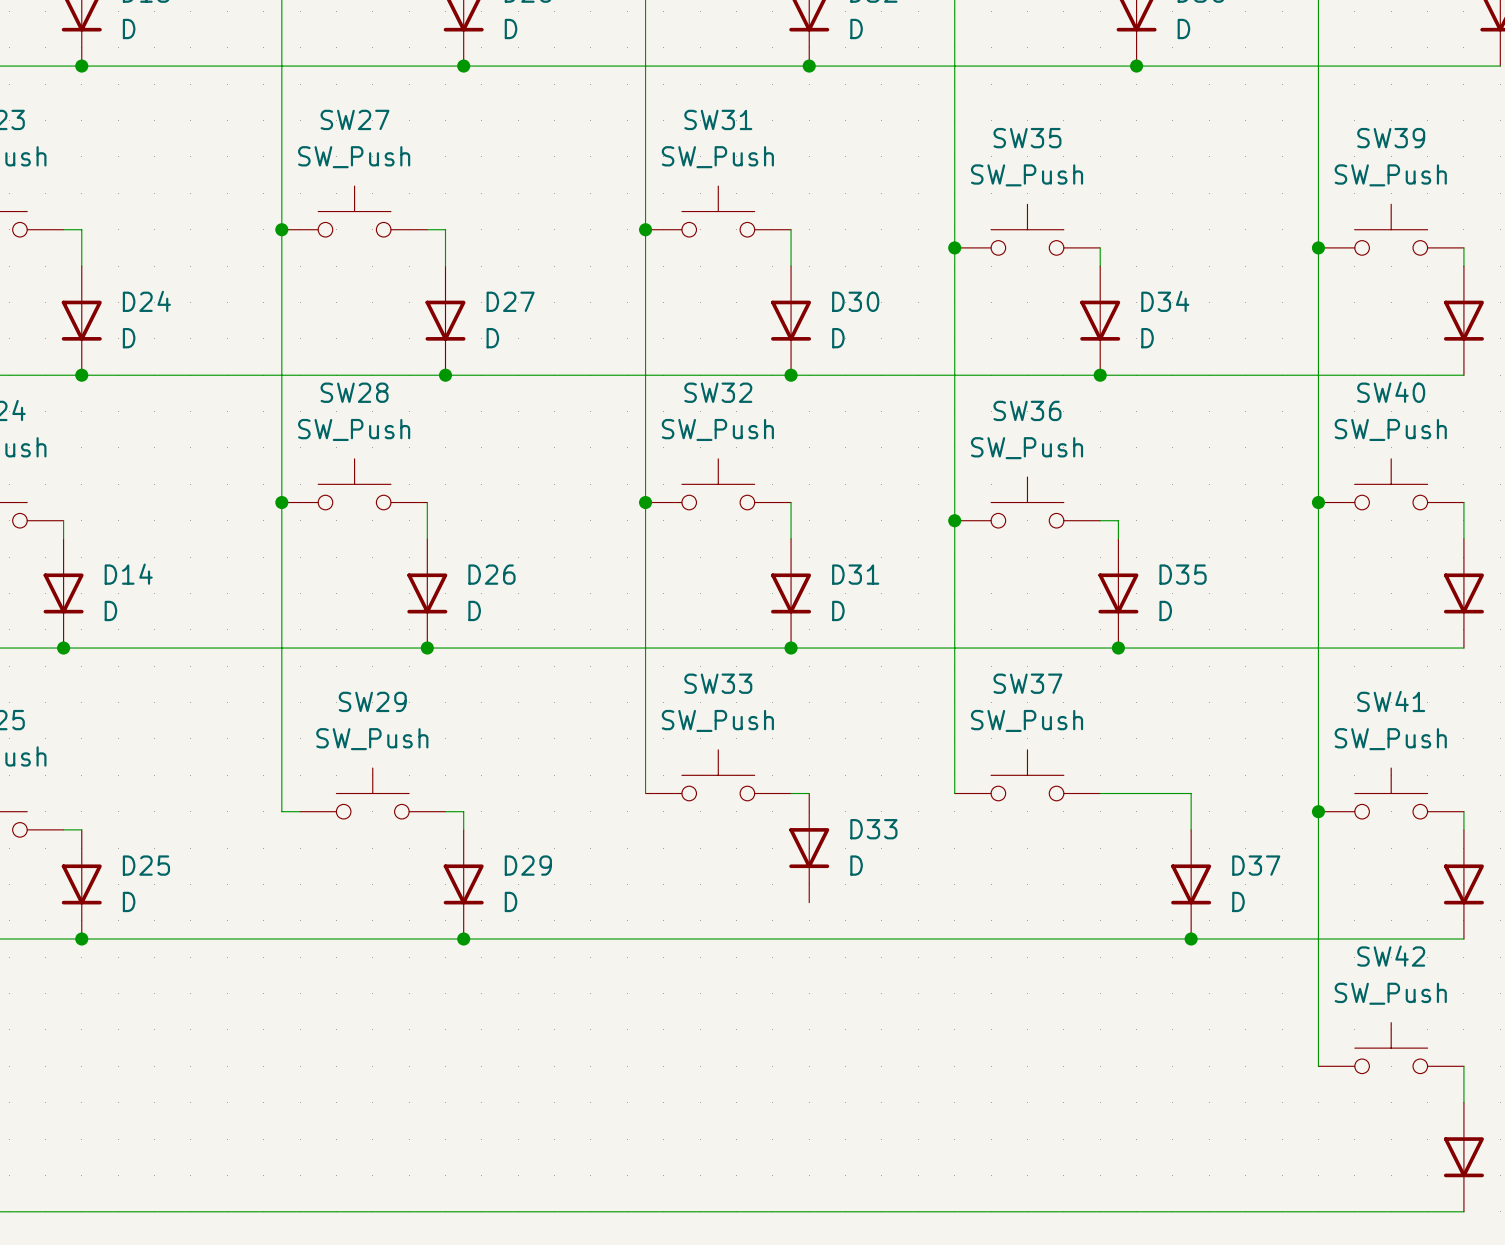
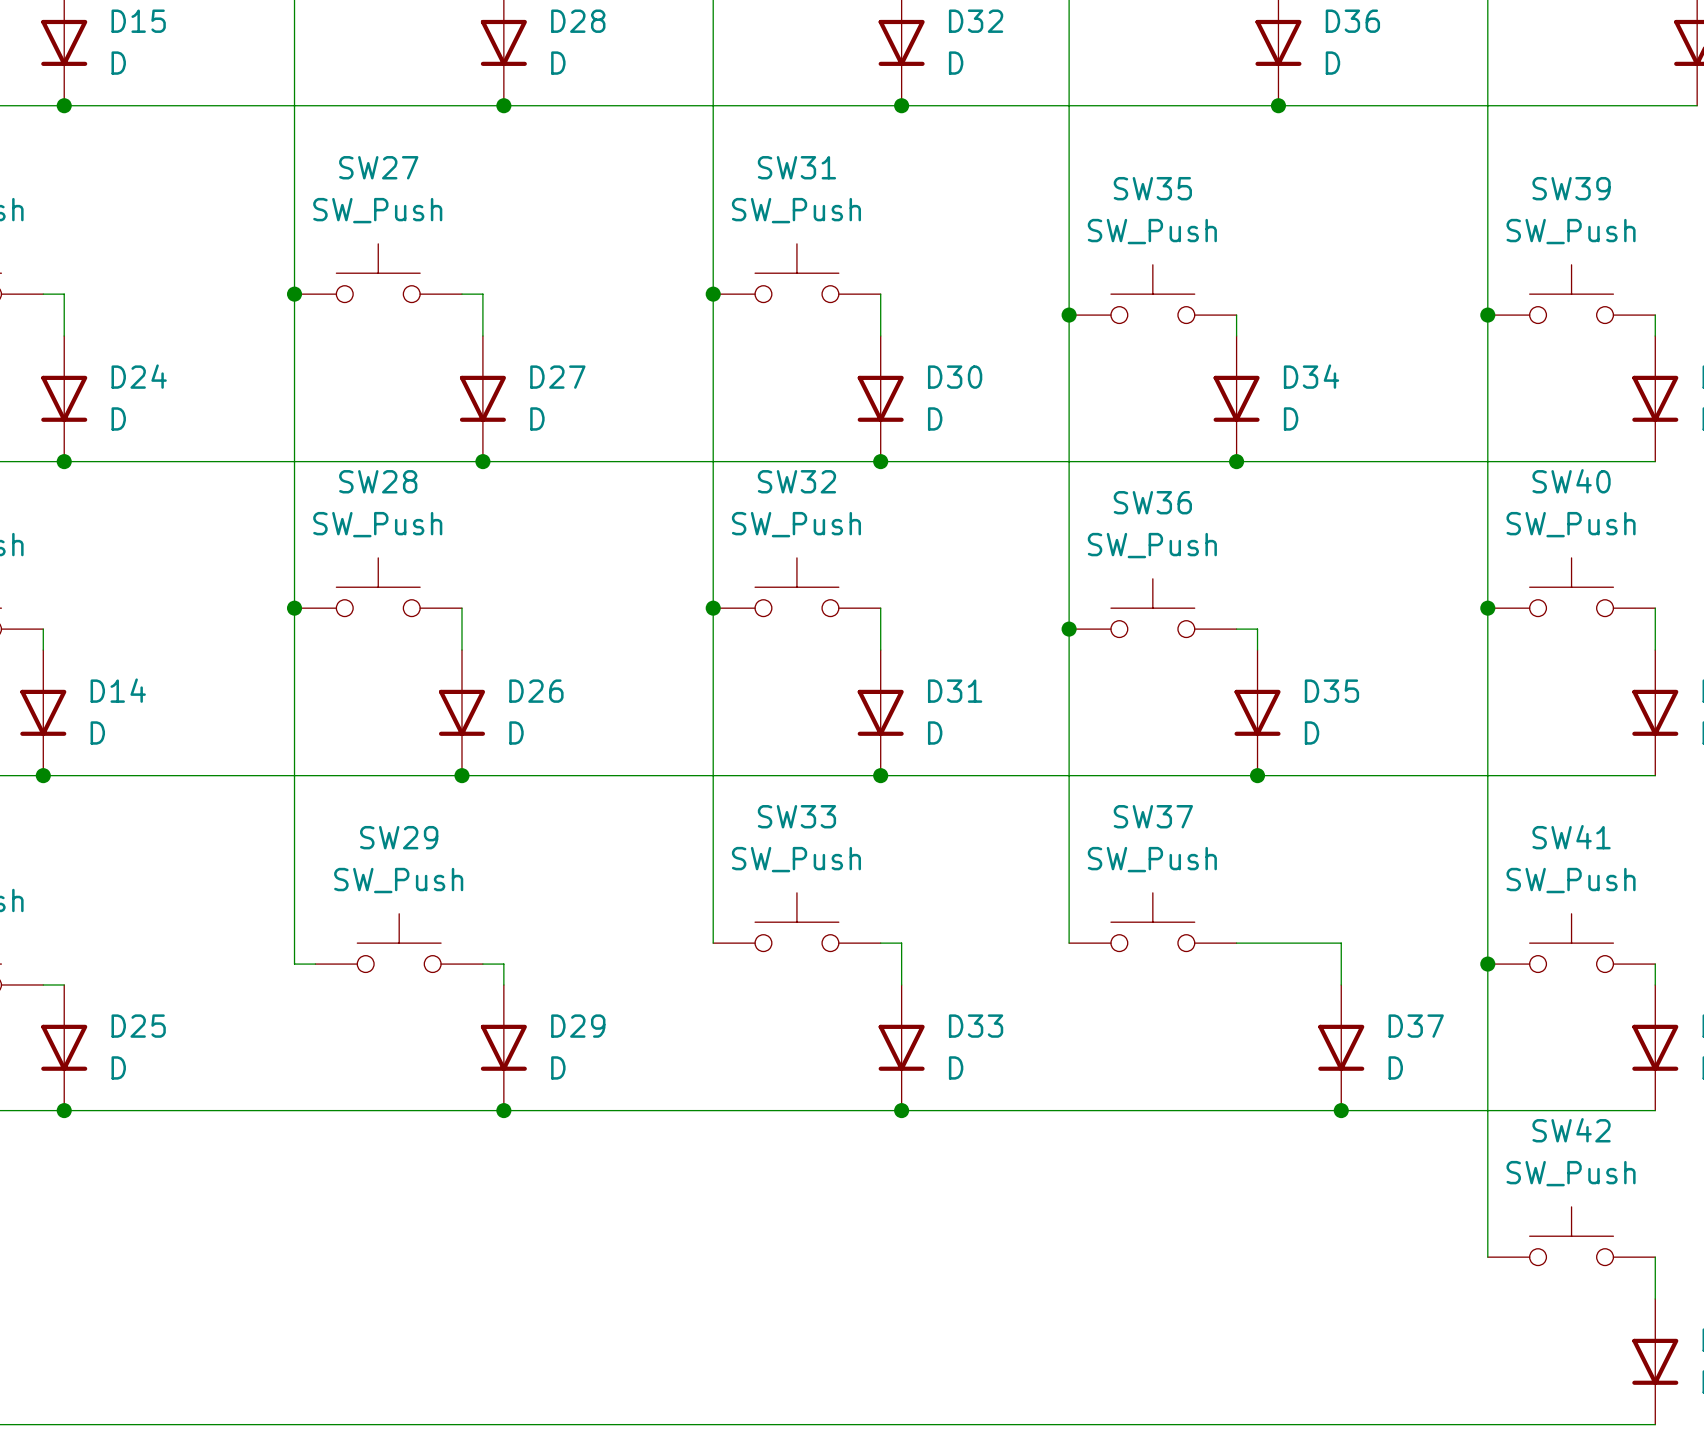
D33 position: (809, 848) -> (901, 1047)
junction: none -> (901, 1110)

